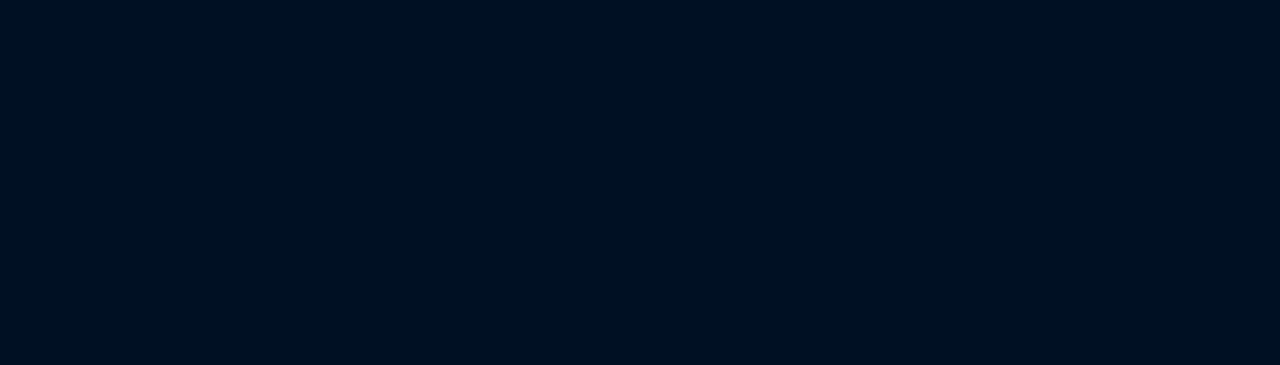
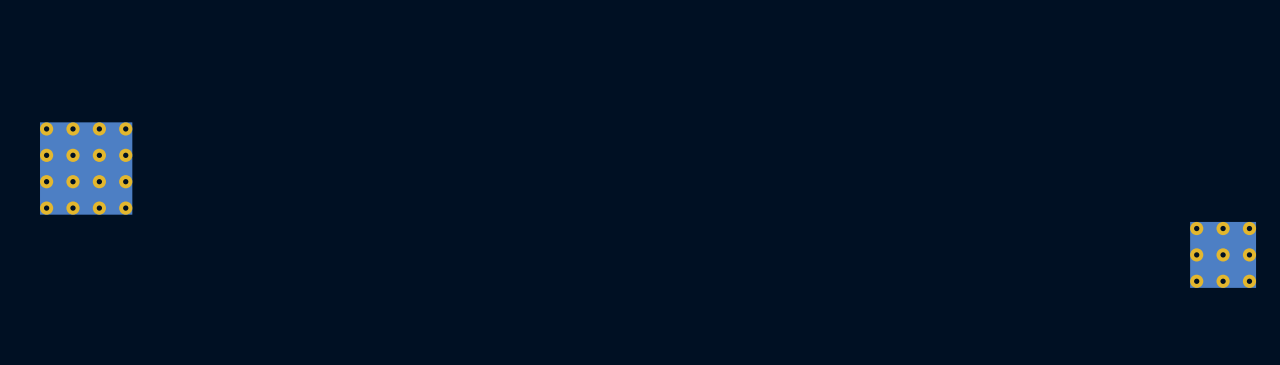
part: none -> (86, 168)
part: none -> (1223, 254)

